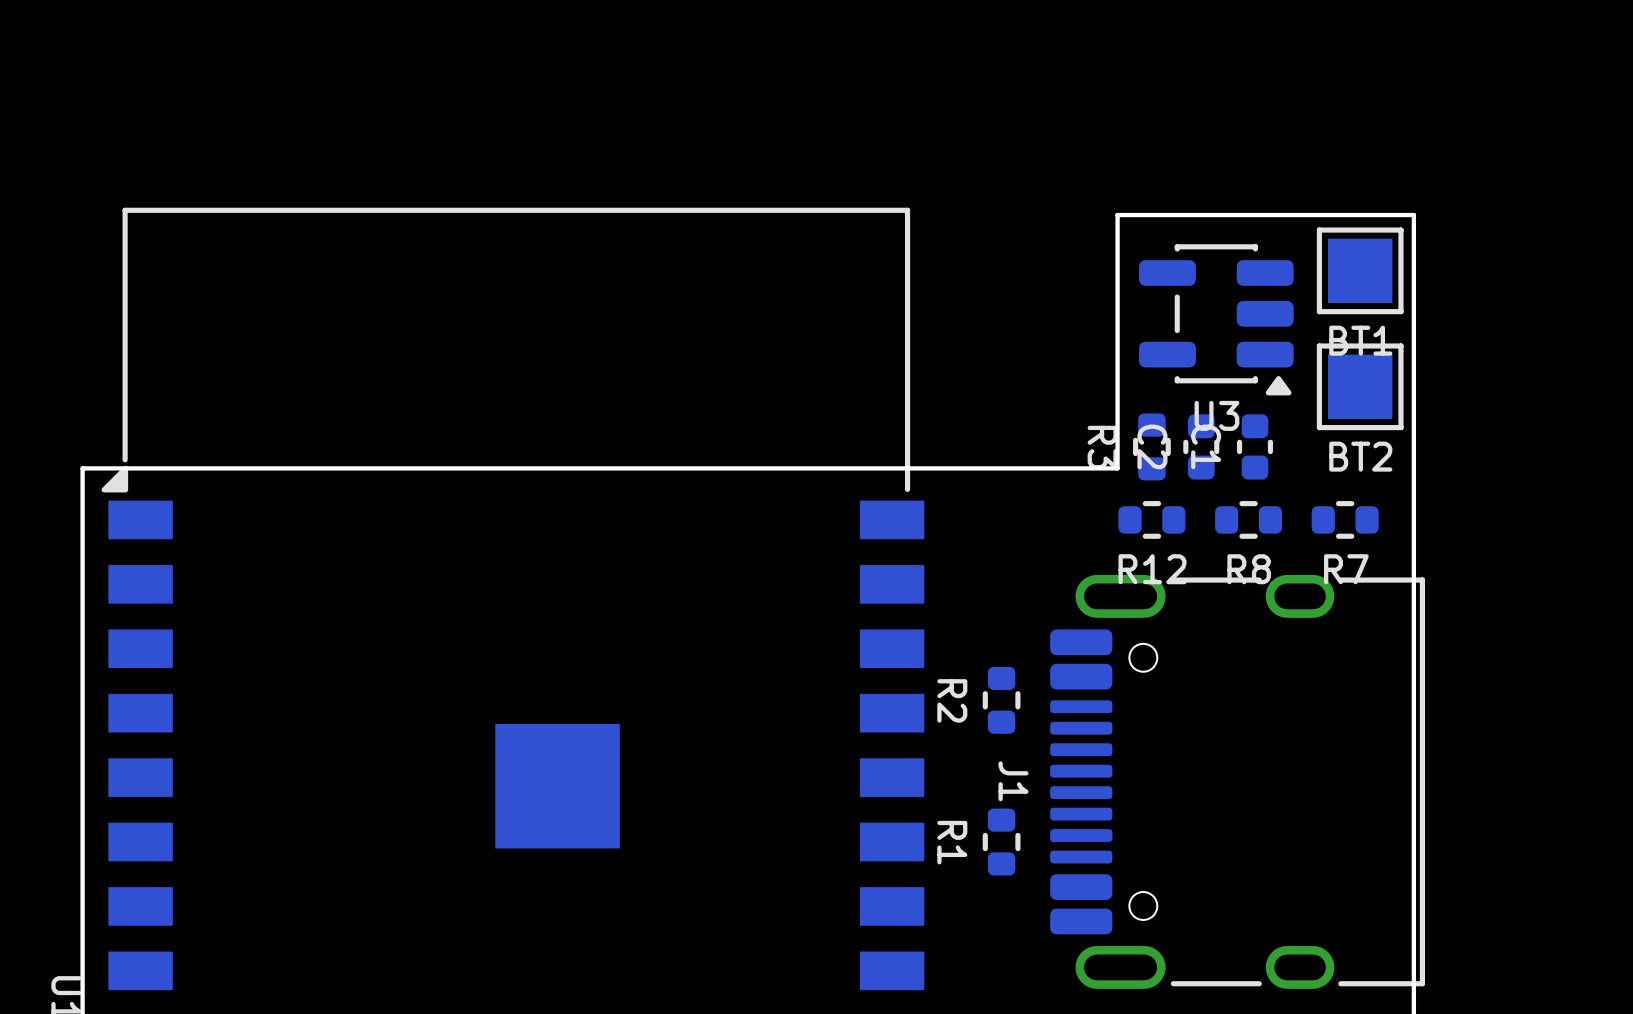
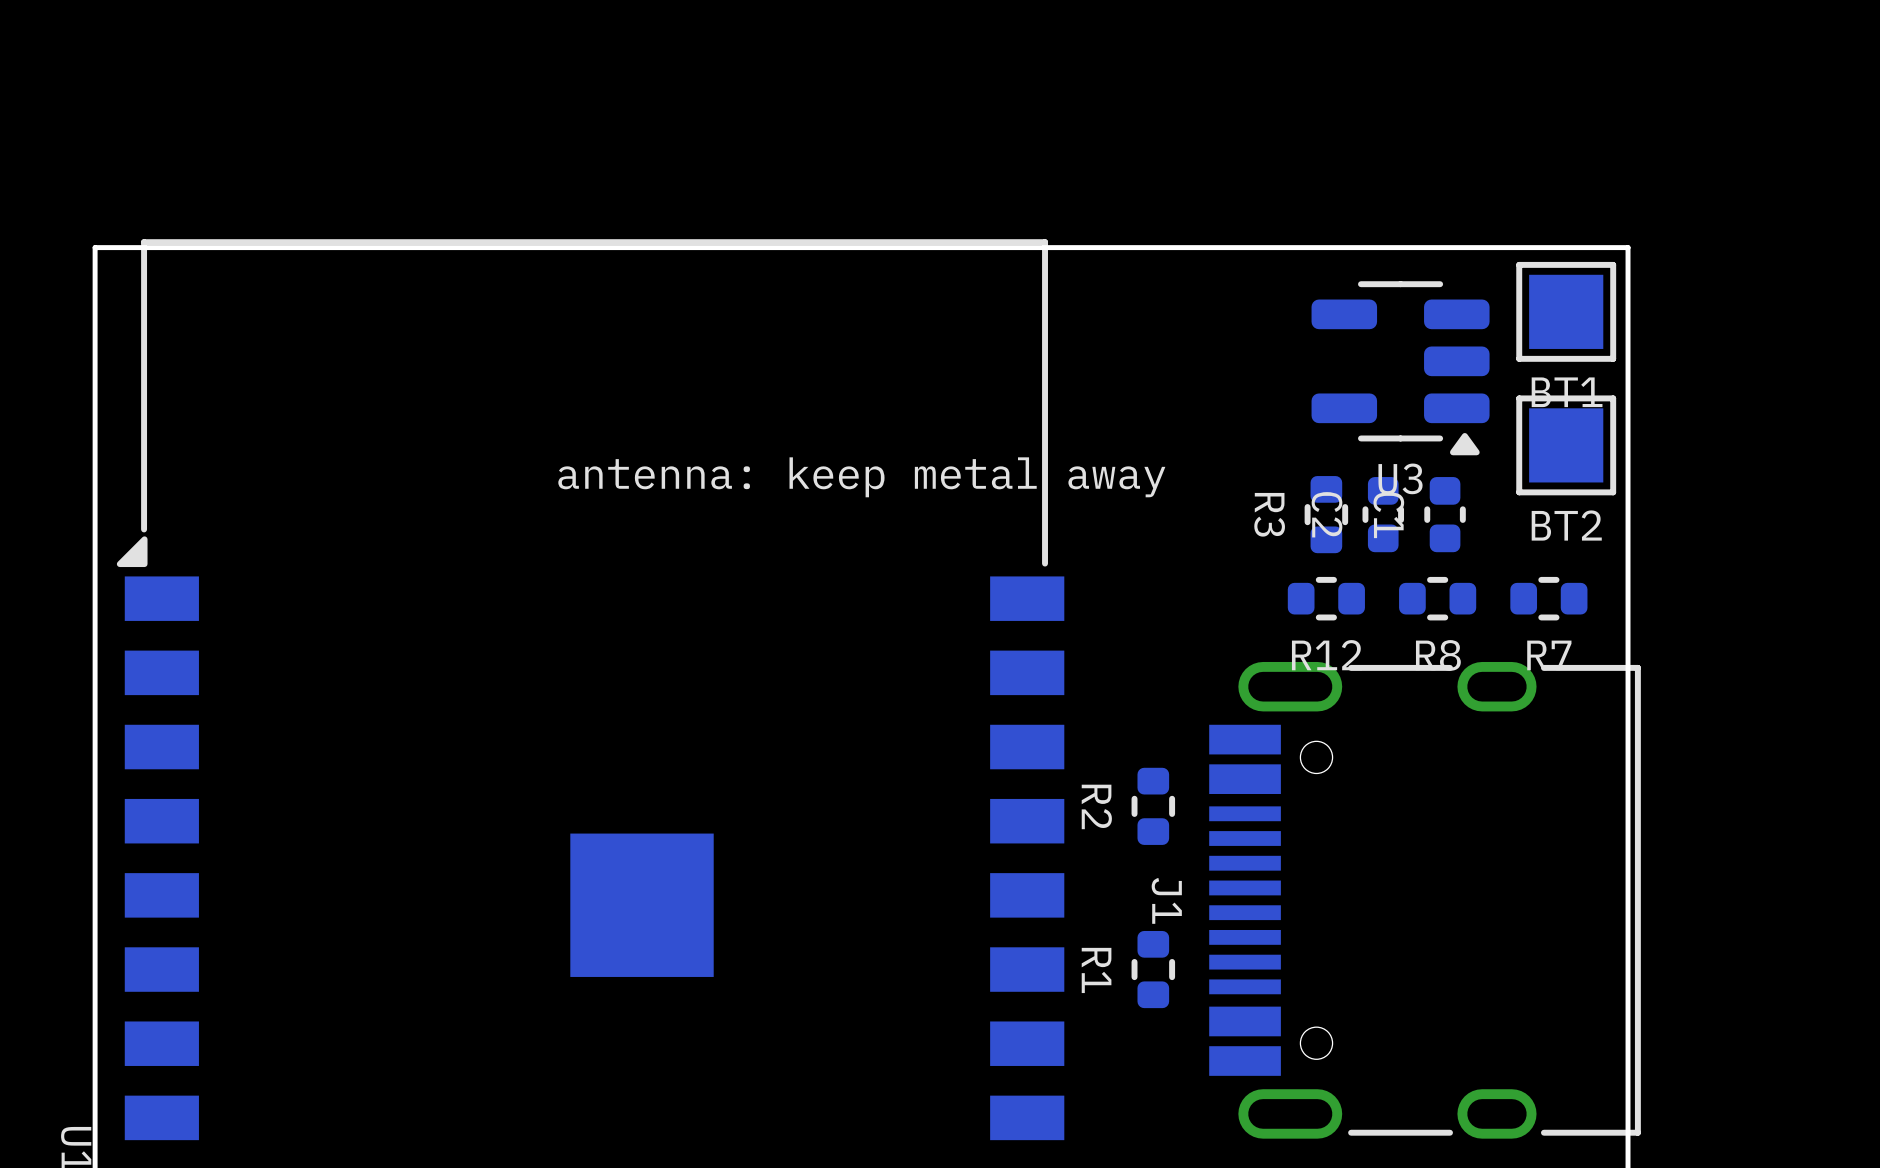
board edge: (1117, 215) (1117, 468) (82, 468) -> (1286, 247) (95, 247) (95, 539)
U3 footprint: [1139, 244, 1294, 396] -> [1311, 281, 1490, 456]
text: none -> antenna: keep metal away (861, 477)
J1 footprint: [1050, 574, 1426, 989] -> [1209, 661, 1641, 1139]

